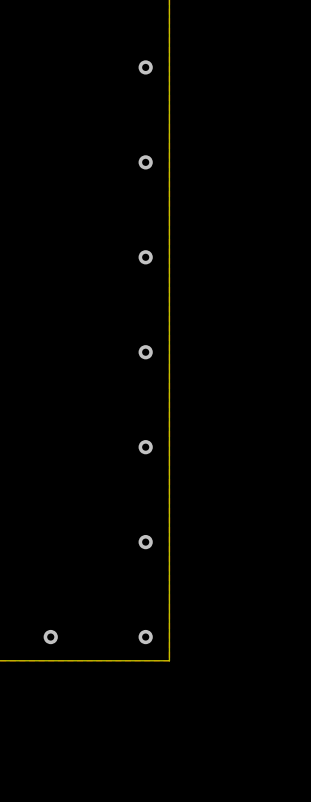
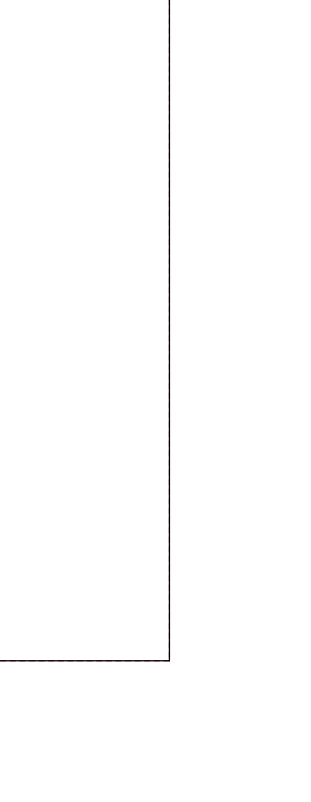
via: (145, 67) -> none
via: (145, 162) -> none
via: (145, 257) -> none
via: (145, 352) -> none
via: (145, 447) -> none
via: (145, 542) -> none
via: (50, 637) -> none
via: (145, 637) -> none

